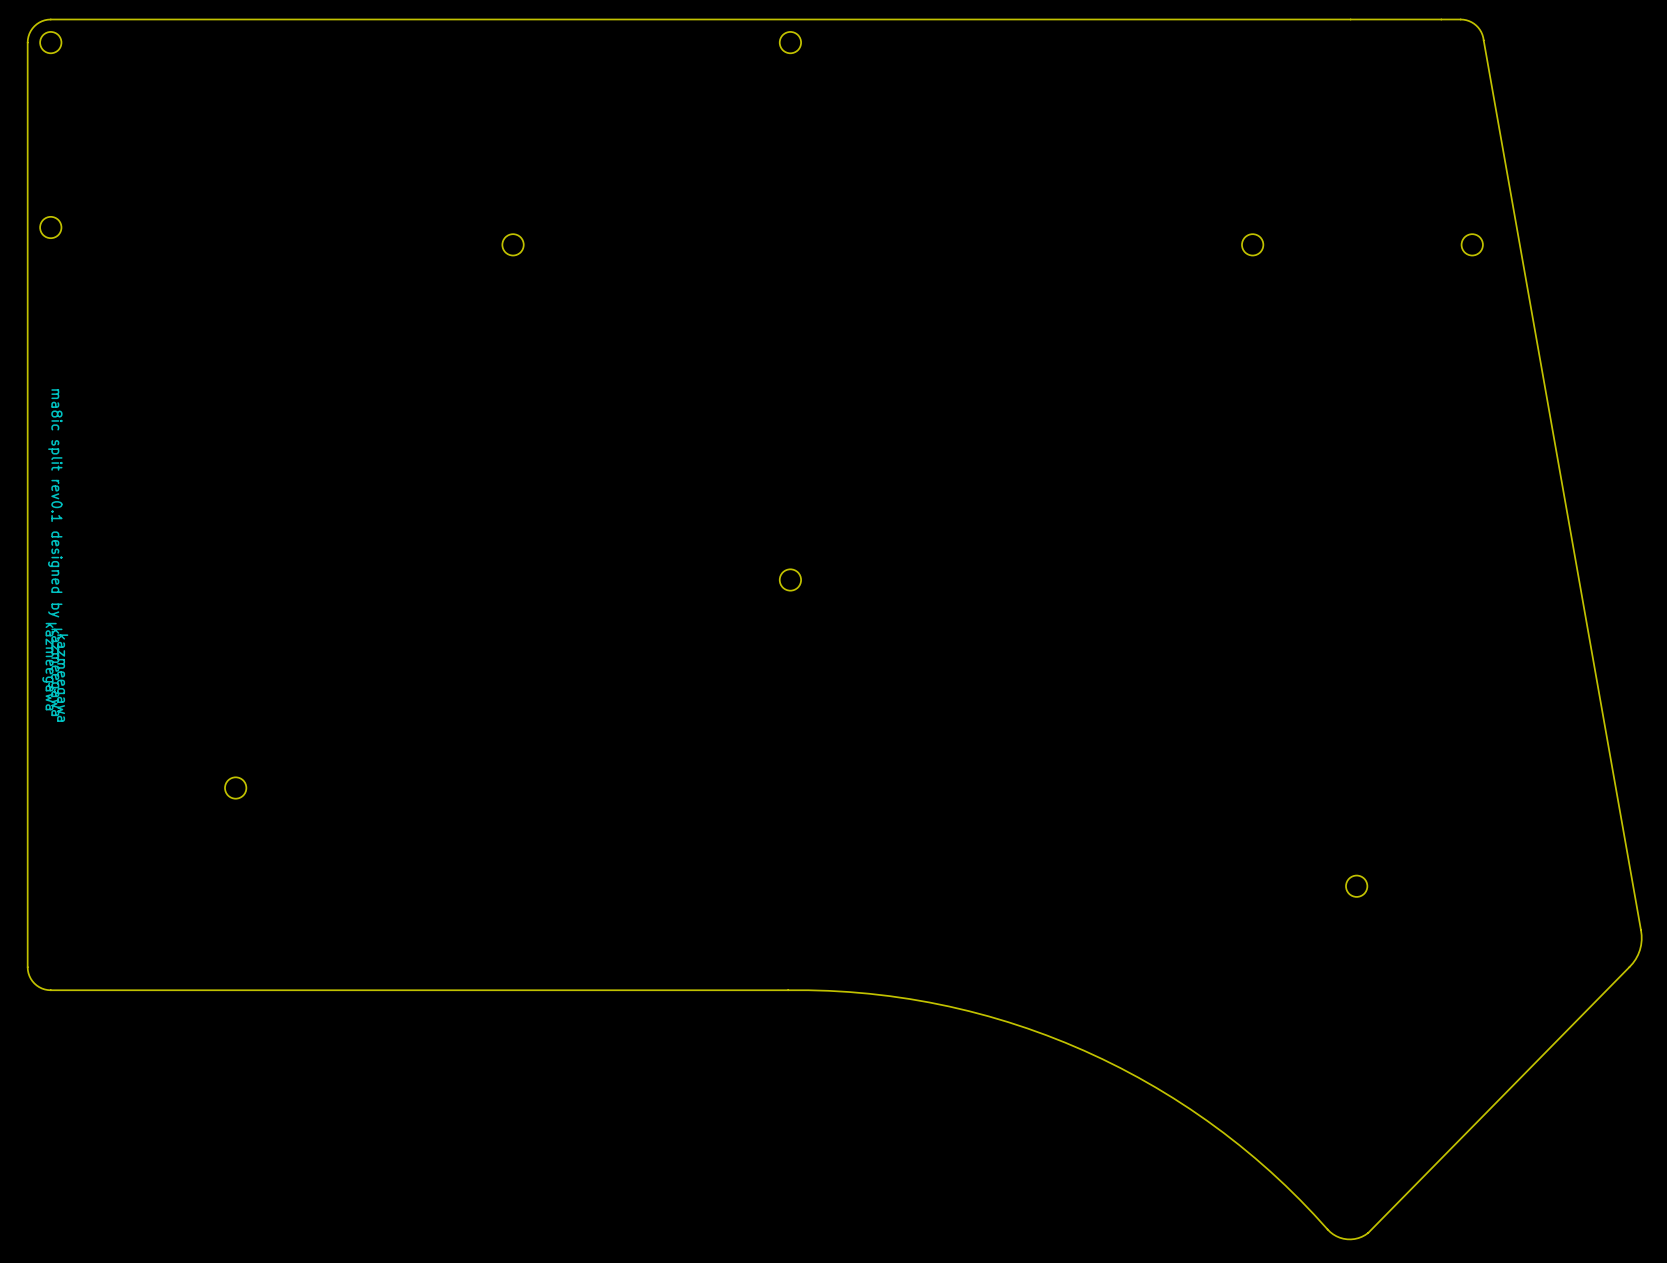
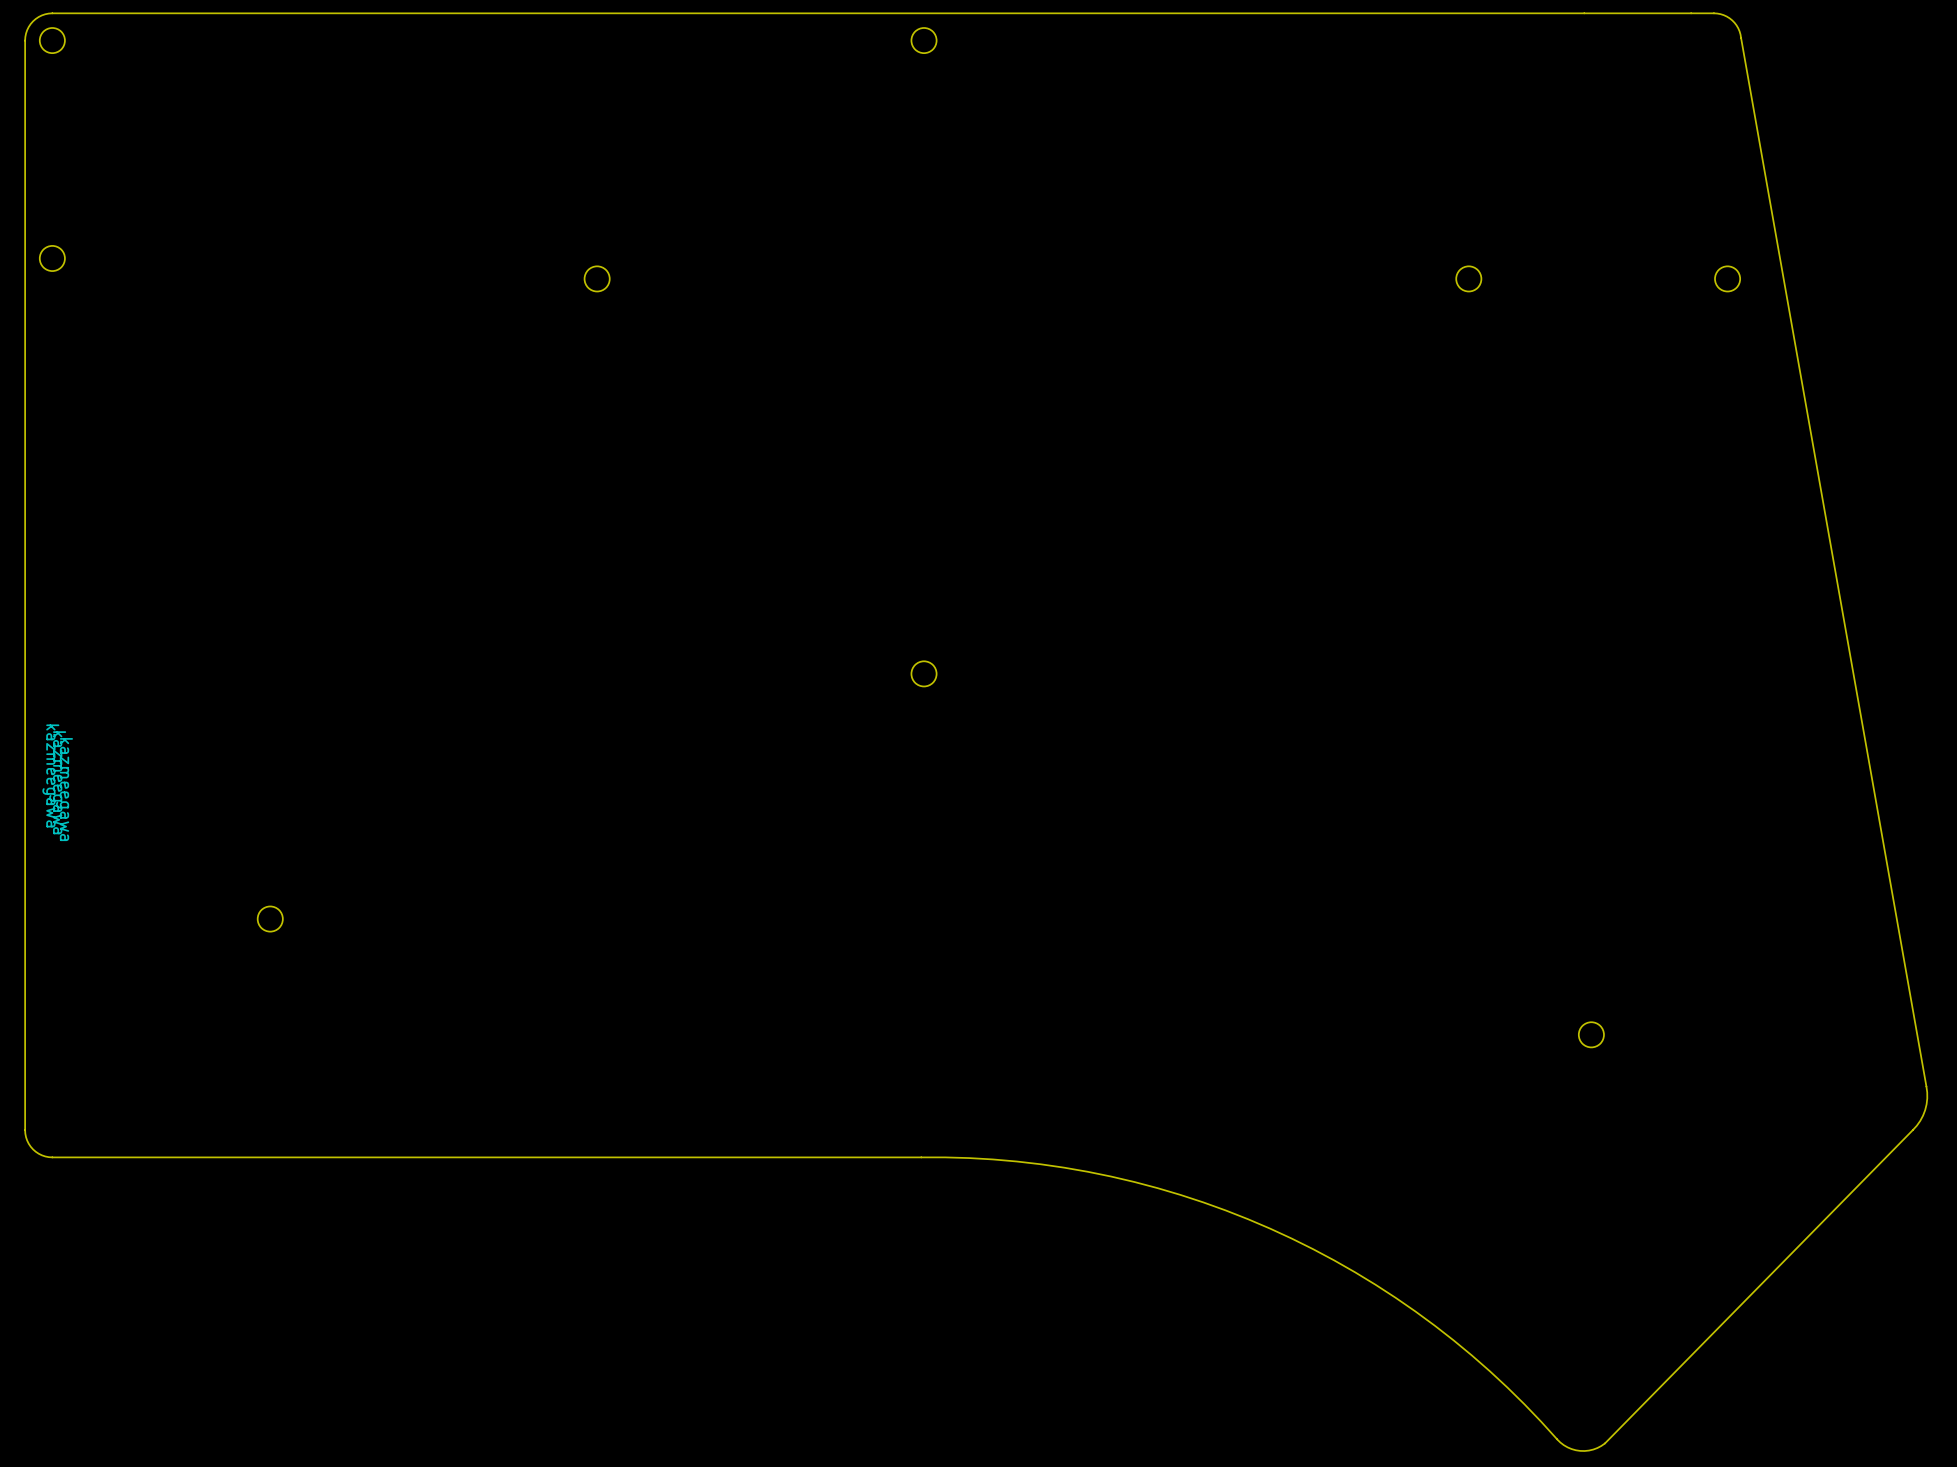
text: ma8ic split rev0.1 (55, 455) -> none
text: designed by (55, 574) -> none

